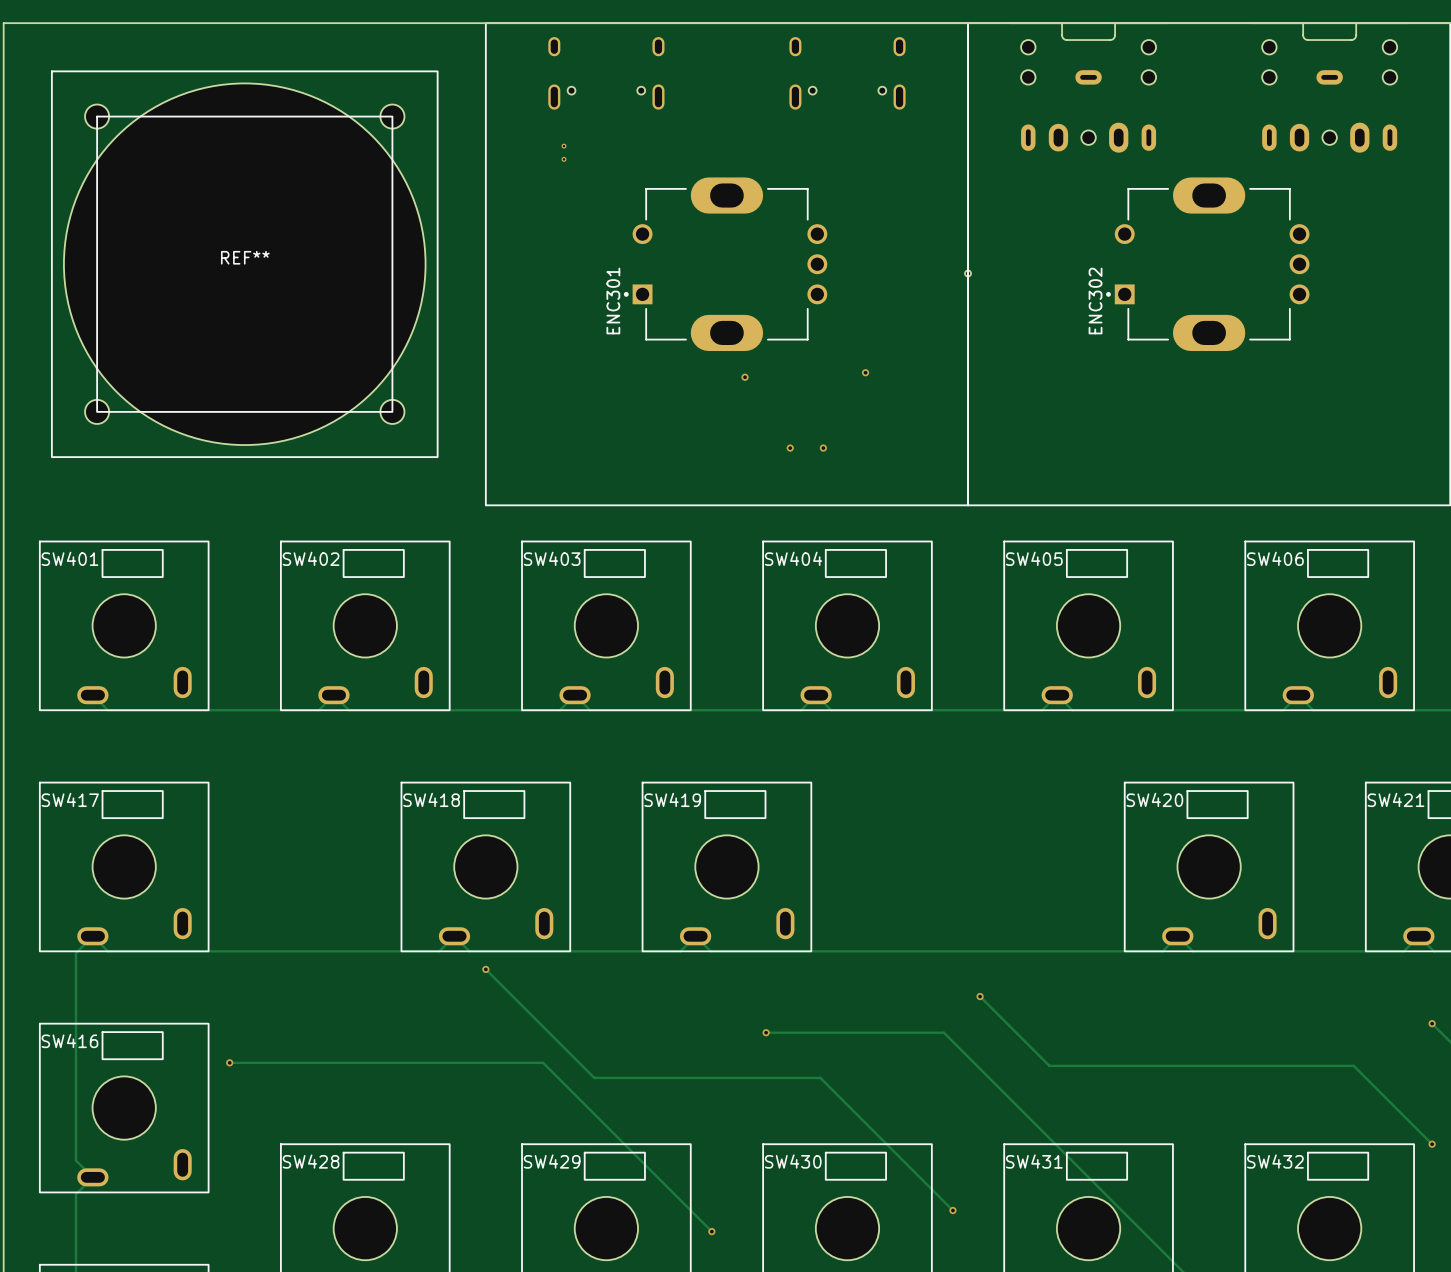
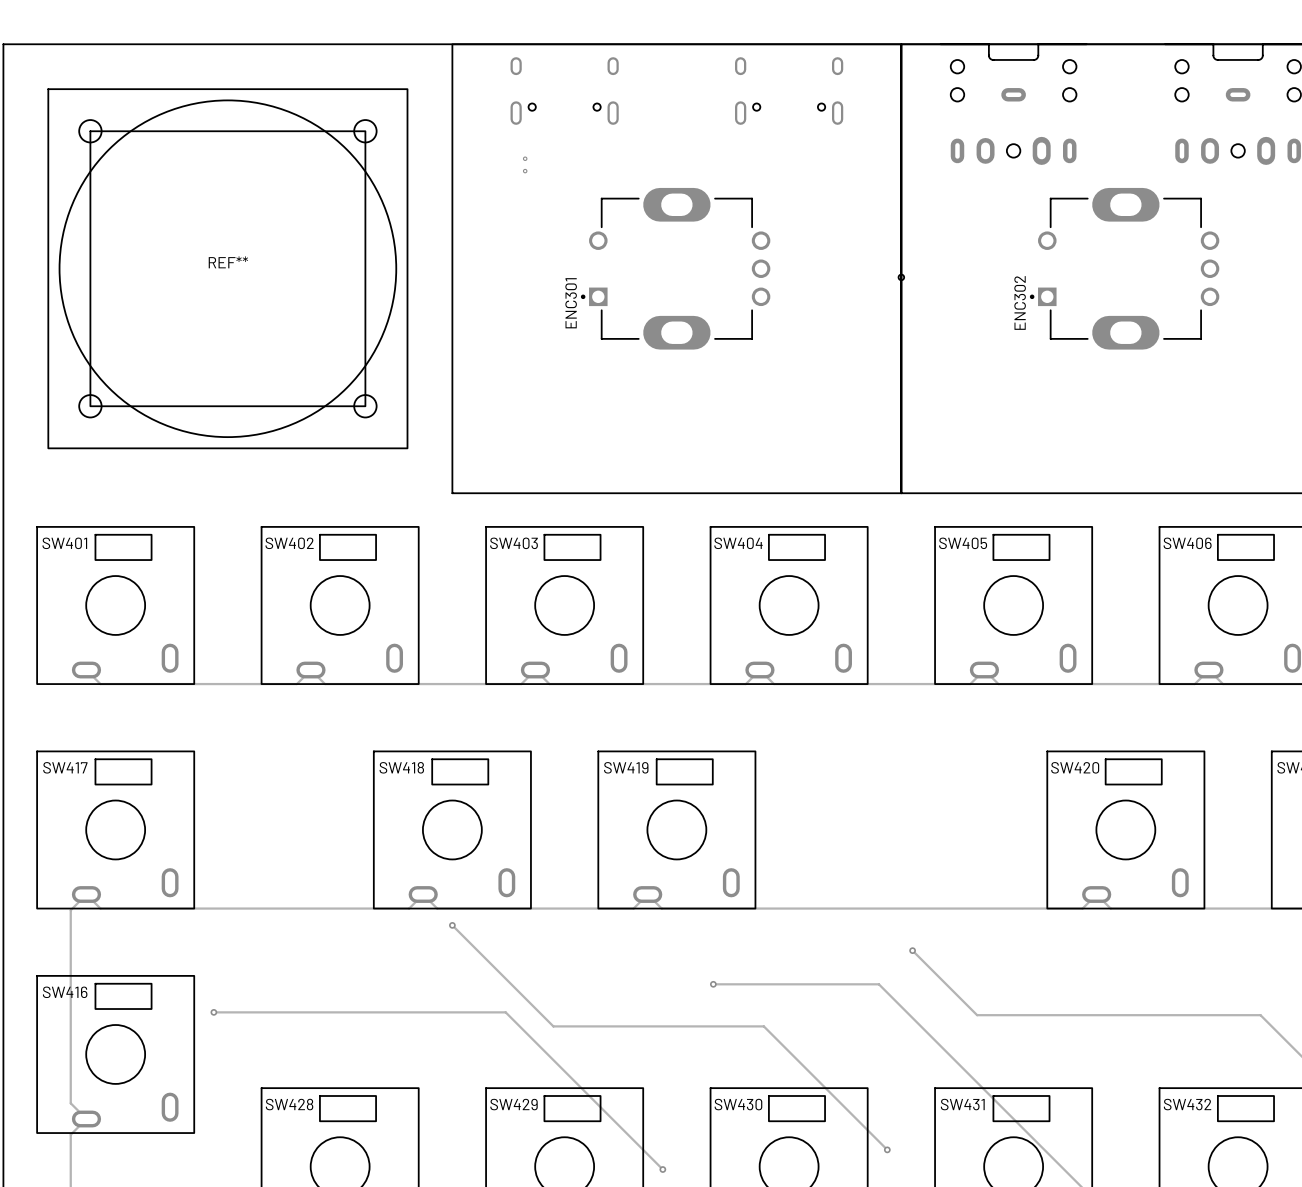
via: (865, 372) -> none
via: (745, 377) -> none
via: (790, 448) -> none
via: (823, 448) -> none

